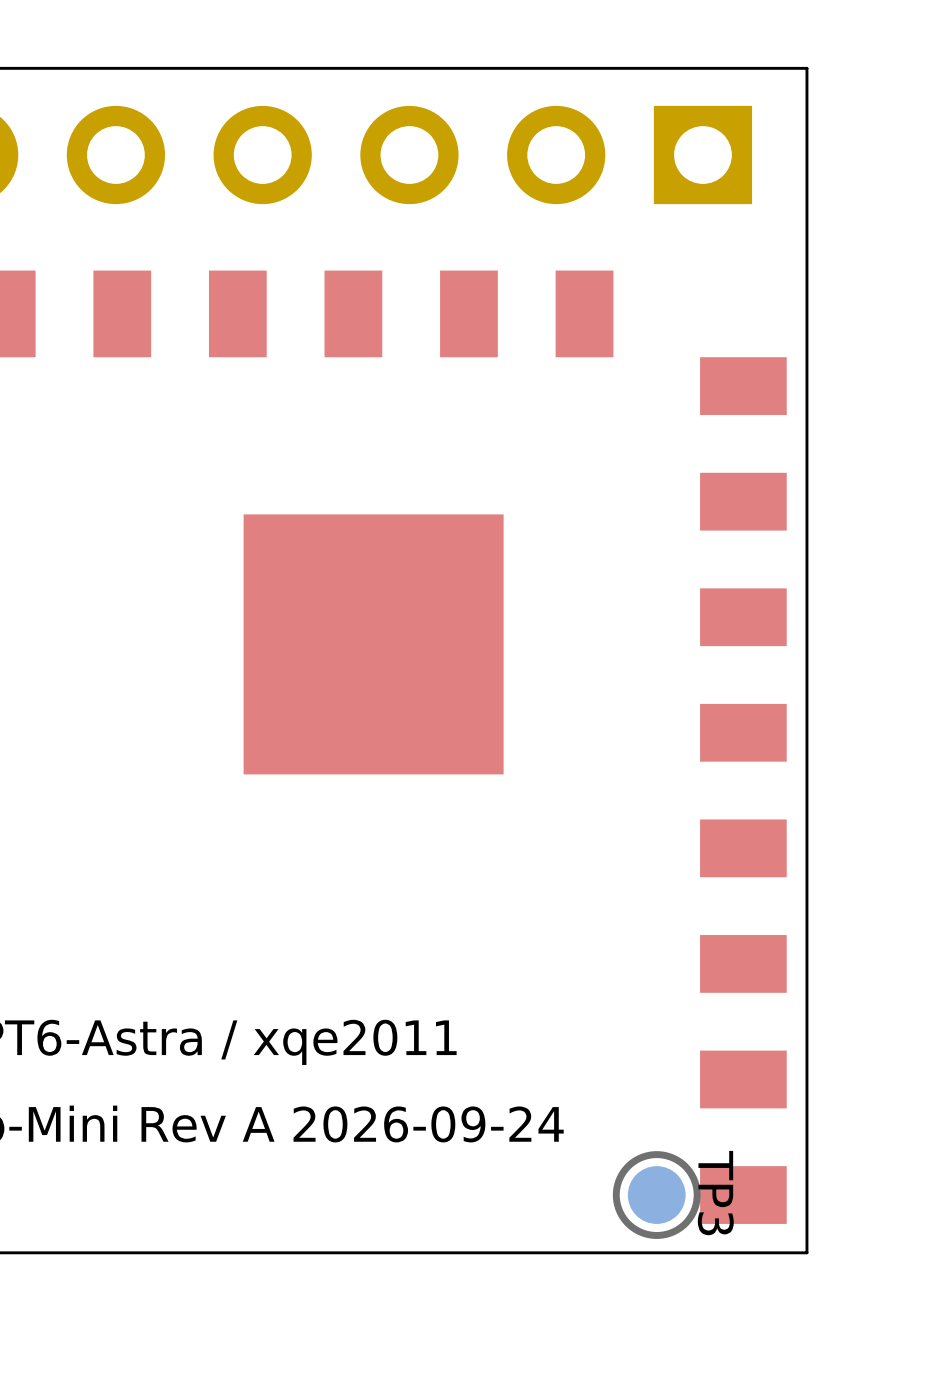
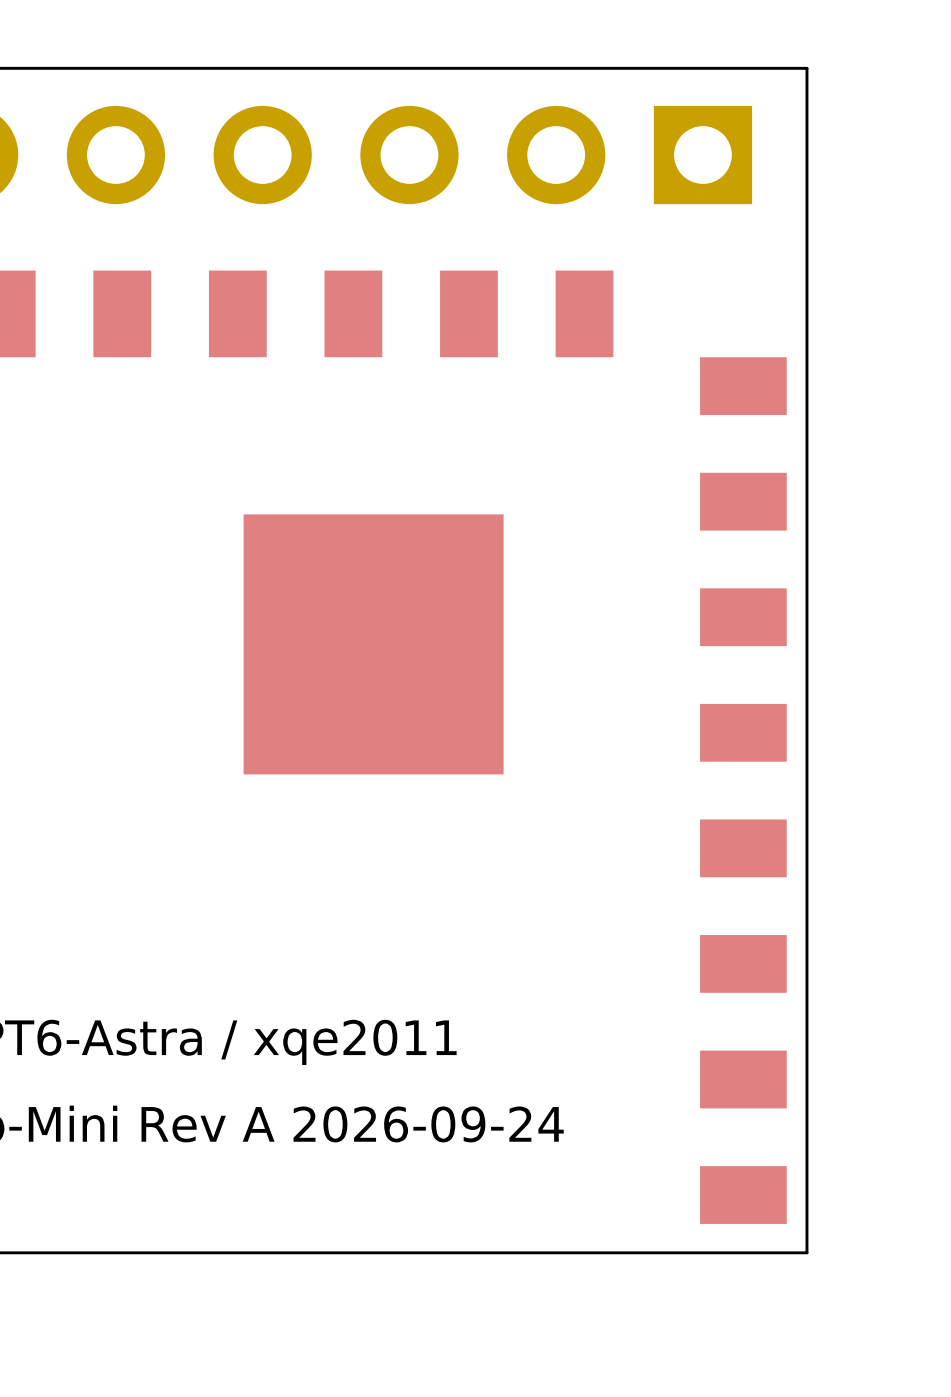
TP3: (656, 1195) -> none

